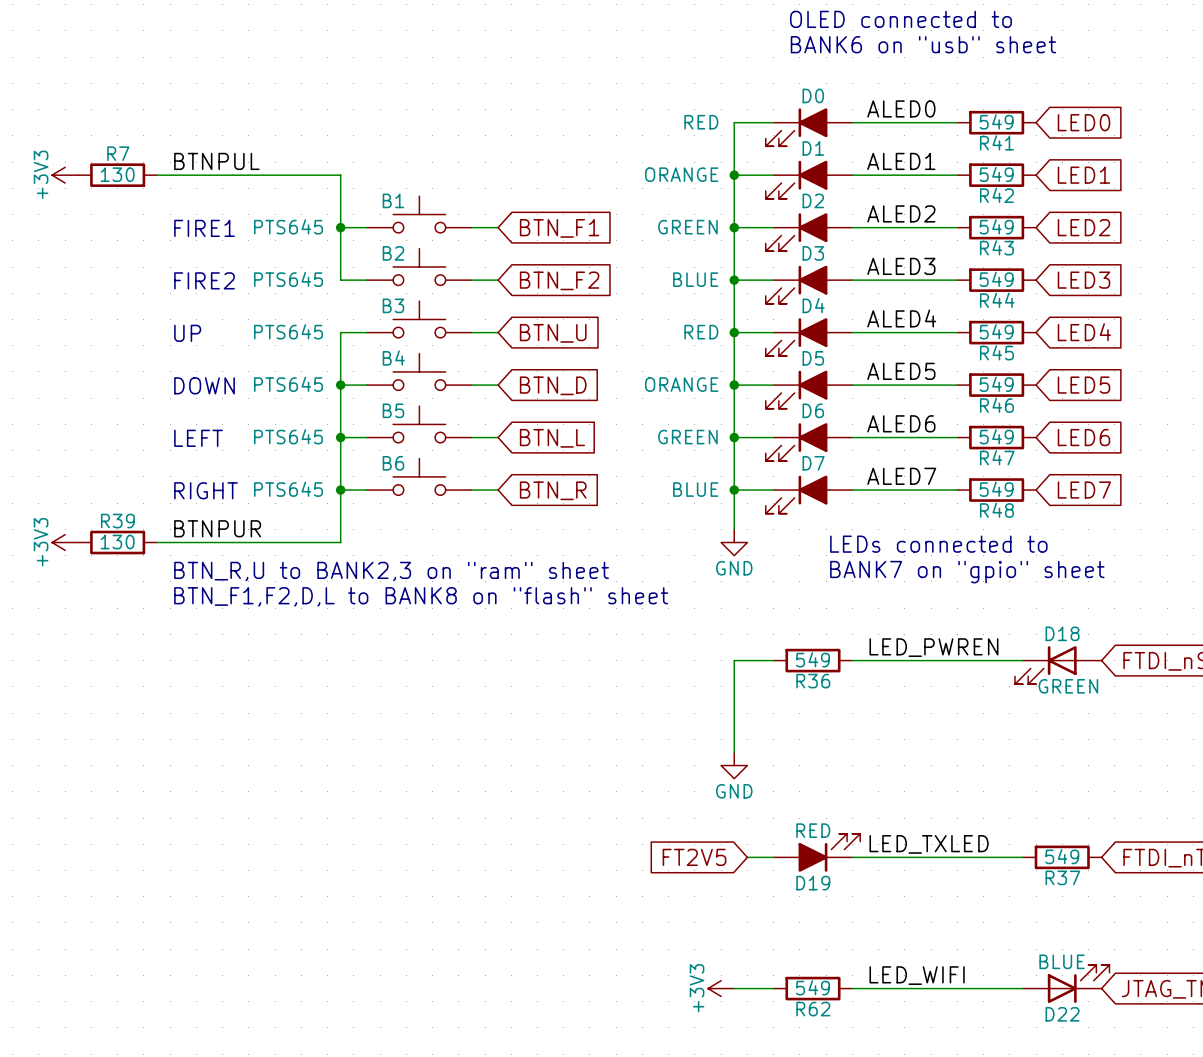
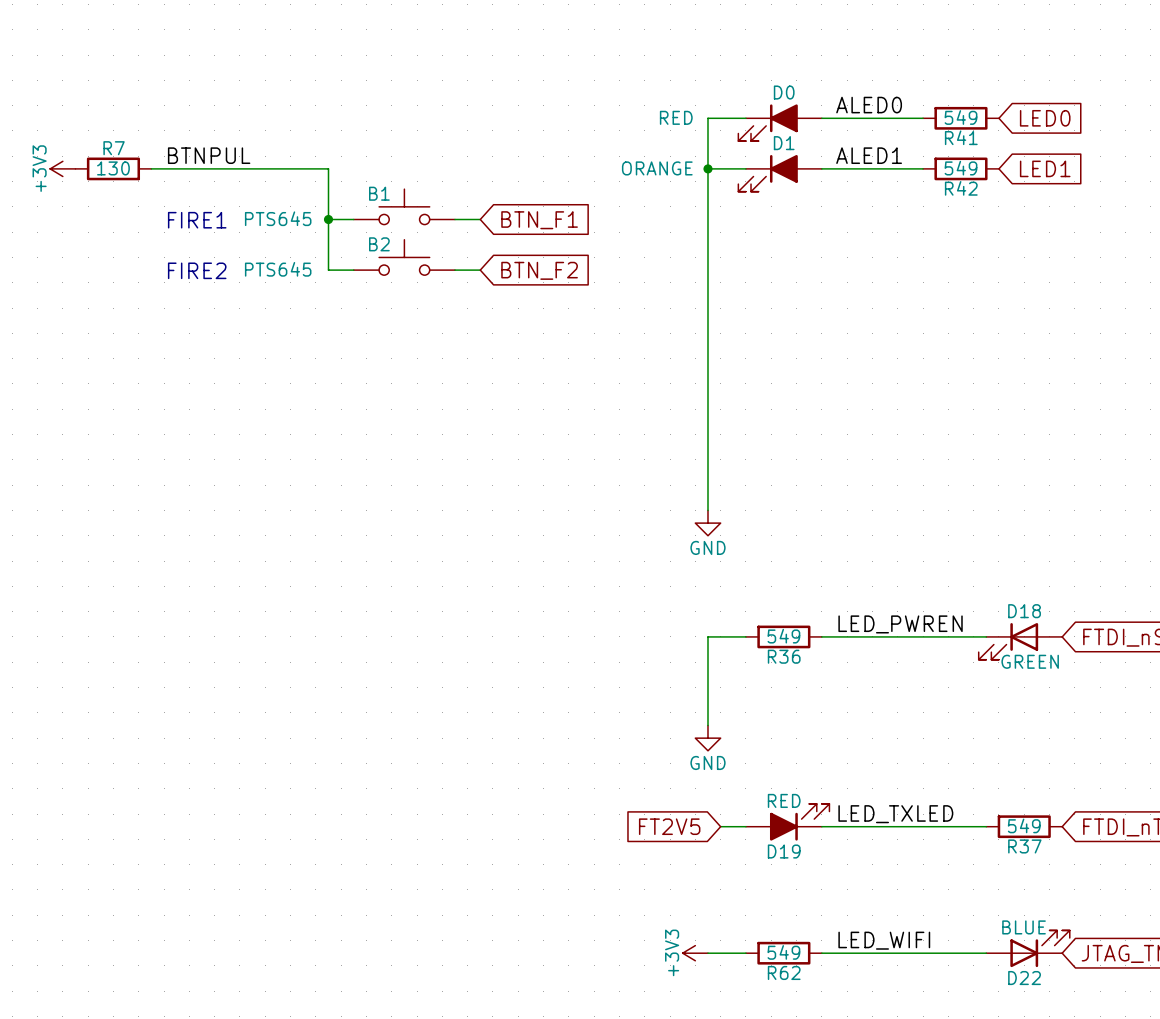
text: OLED connected to (900, 19) -> none
text: BANK6 on "usb" sheet (923, 44) -> none
label: ALED2 (901, 213) -> none
wire: (734, 227) (773, 227) -> none
junction: (734, 227) -> none
wire: (852, 227) (957, 227) -> none
R43: 549 (996, 227) -> none
global label: LED2 (1083, 227) -> none
D2: GREEN (809, 232) -> none
label: ALED3 (901, 266) -> none
wire: (734, 280) (773, 280) -> none
junction: (734, 280) -> none
wire: (852, 280) (957, 280) -> none
R44: 549 (996, 280) -> none
global label: LED3 (1083, 280) -> none
D3: BLUE (809, 284) -> none
label: ALED4 (901, 318) -> none
B3: PTS645 (419, 319) -> none
wire: (366, 332) (340, 332) (340, 542) (157, 542) -> none
wire: (471, 332) (498, 332) -> none
wire: (734, 332) (773, 332) -> none
junction: (734, 332) -> none
wire: (852, 332) (957, 332) -> none
R45: 549 (996, 332) -> none
global label: LED4 (1084, 332) -> none
text: UP (187, 333) -> none
global label: BTN_U (553, 333) -> none
D4: RED (809, 337) -> none
B4: PTS645 (419, 371) -> none
label: ALED5 (901, 371) -> none
text: DOWN (204, 385) -> none
wire: (340, 385) (366, 385) -> none
junction: (340, 385) -> none
wire: (471, 385) (498, 385) -> none
global label: BTN_D (553, 385) -> none
wire: (734, 385) (773, 385) -> none
junction: (734, 385) -> none
wire: (852, 385) (957, 385) -> none
R46: 549 (996, 385) -> none
global label: LED5 (1083, 385) -> none
D5: ORANGE (809, 389) -> none
label: ALED6 (901, 423) -> none
B5: PTS645 (419, 424) -> none
wire: (340, 437) (366, 437) -> none
junction: (340, 437) -> none
wire: (471, 437) (498, 437) -> none
wire: (734, 437) (773, 437) -> none
junction: (734, 437) -> none
wire: (852, 437) (957, 437) -> none
R47: 549 (996, 437) -> none
global label: LED6 (1083, 437) -> none
text: LEFT (198, 438) -> none
global label: BTN_L (552, 438) -> none
D6: GREEN (809, 442) -> none
B6: PTS645 (419, 476) -> none
label: ALED7 (901, 476) -> none
text: RIGHT (206, 490) -> none
wire: (340, 490) (366, 490) -> none
junction: (340, 490) -> none
wire: (471, 490) (498, 490) -> none
global label: BTN_R (553, 490) -> none
wire: (734, 490) (773, 490) -> none
junction: (734, 490) -> none
wire: (852, 490) (957, 490) -> none
R48: 549 (996, 490) -> none
global label: LED7 (1084, 490) -> none
D7: BLUE (809, 494) -> none
label: BTNPUR (217, 528) -> none
power symbol: +3V3 (65, 542) -> none
R39: 130 (117, 542) -> none
text: LEDs connected to (938, 544) -> none
text: BTN_R,U to BANK2,3 on "ram" sheet (391, 571) -> none
text: BANK7 on "gpio" sheet (967, 572) -> none
text: BTN_F1,F2,D,L to BANK8 on "flash" sheet (421, 596) -> none

